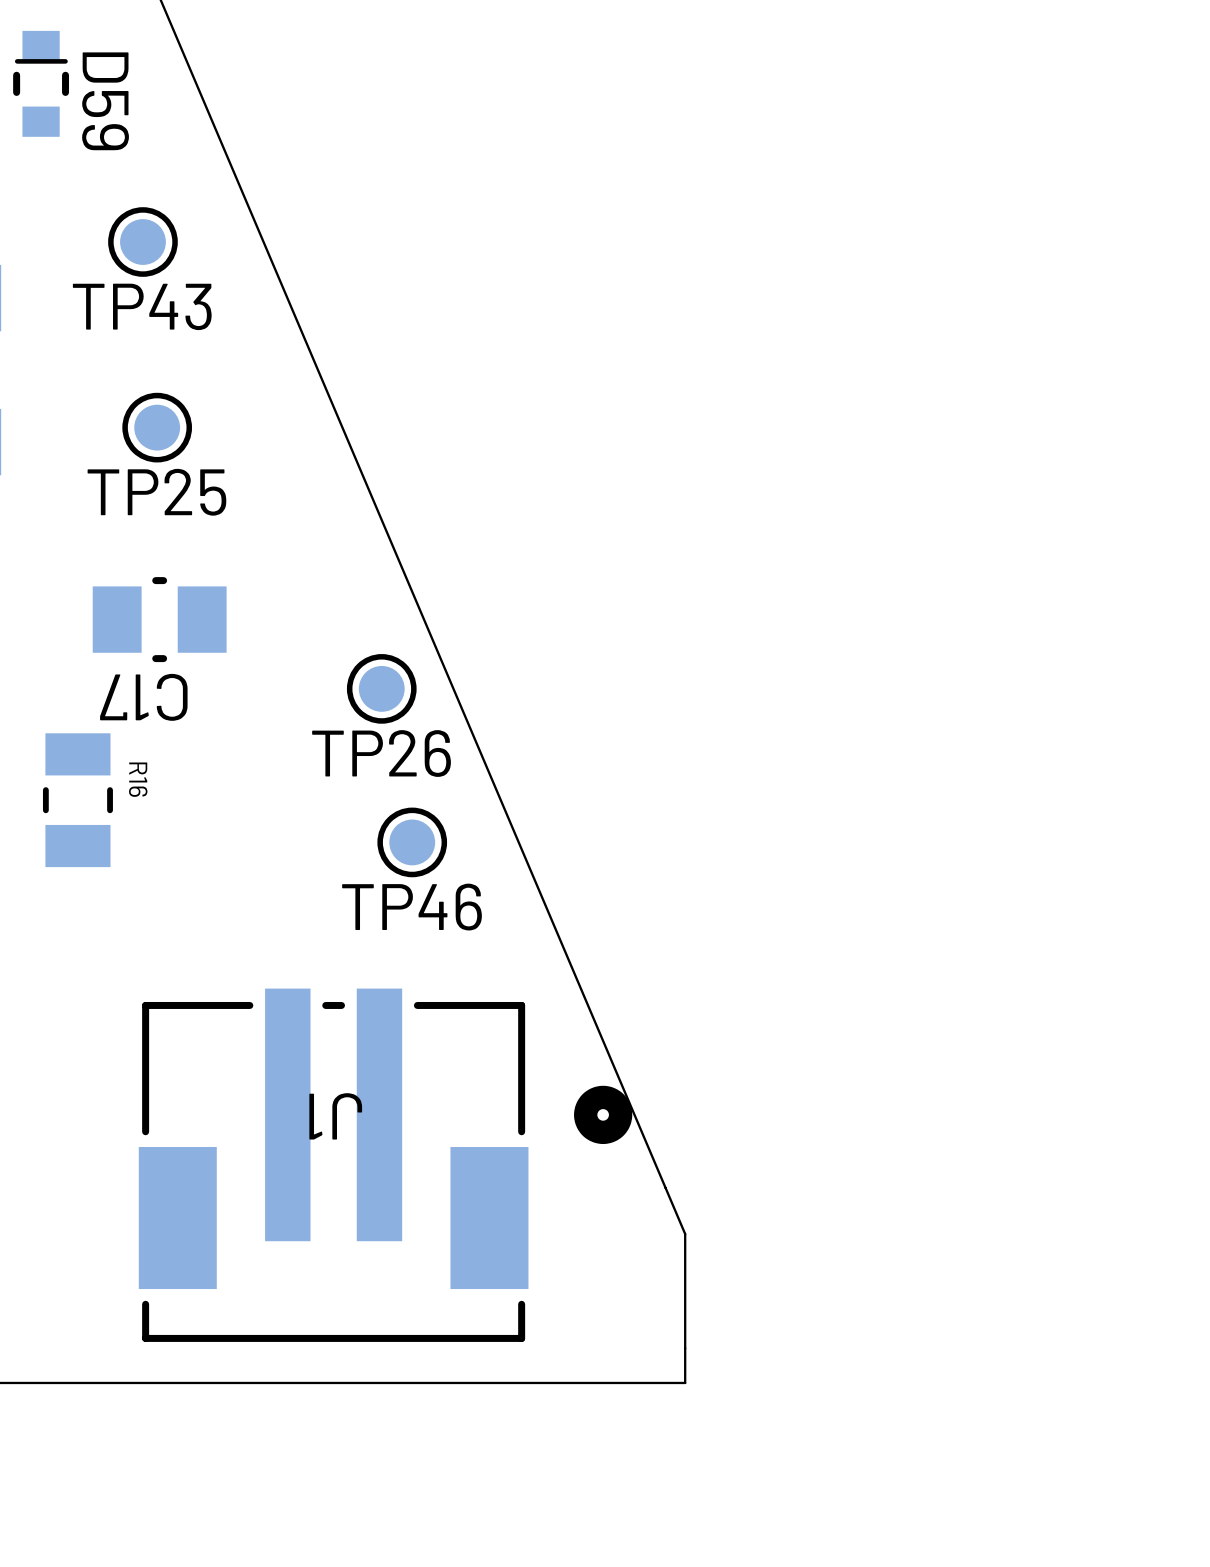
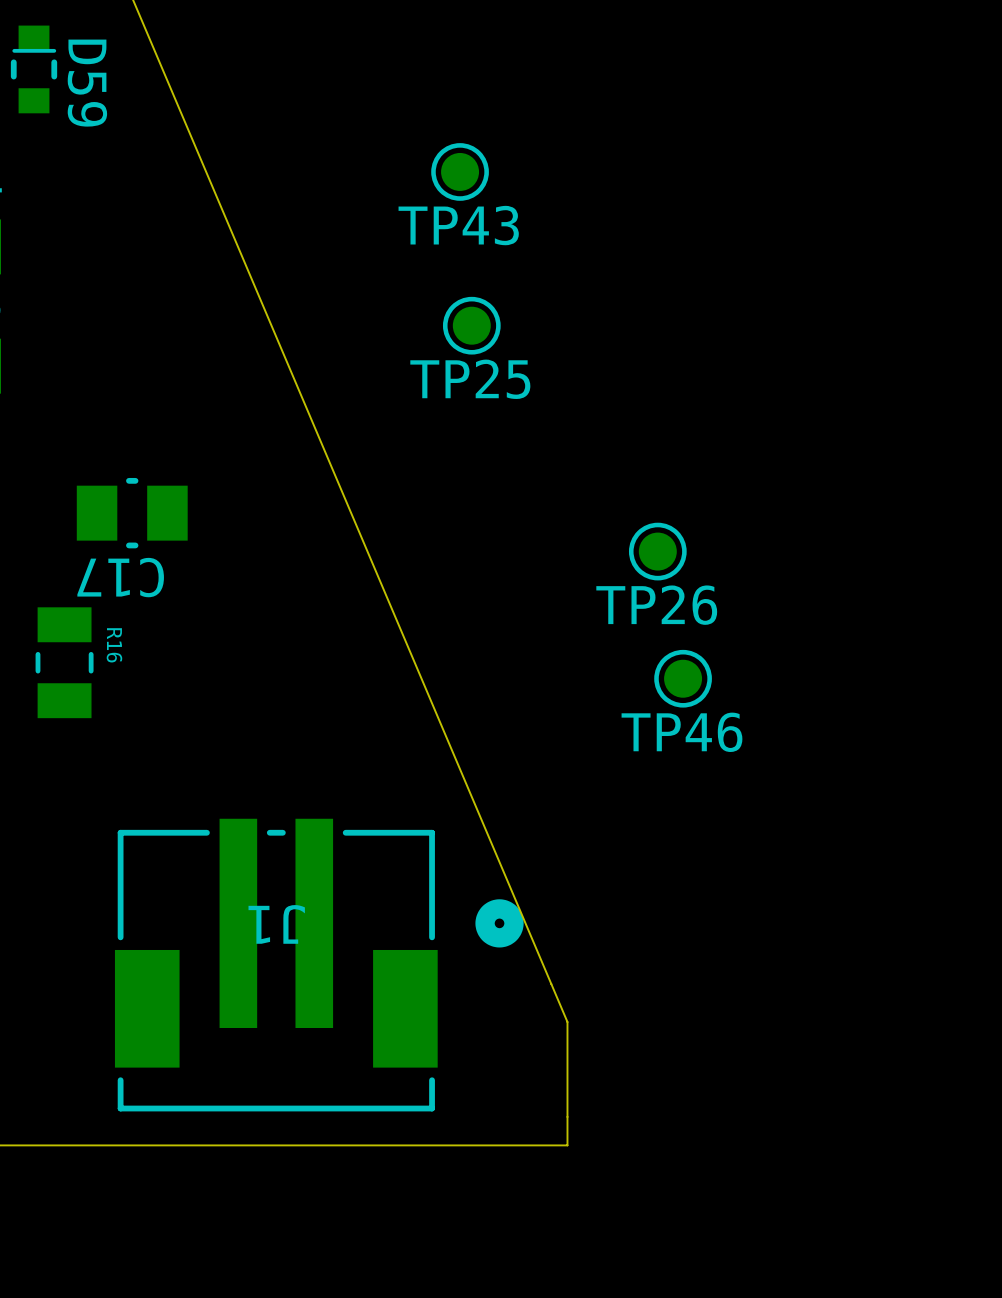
TP43 position: (142, 242) -> (460, 171)
TP25 position: (157, 427) -> (471, 325)
TP26 position: (381, 688) -> (657, 551)
TP46 position: (412, 842) -> (683, 678)

